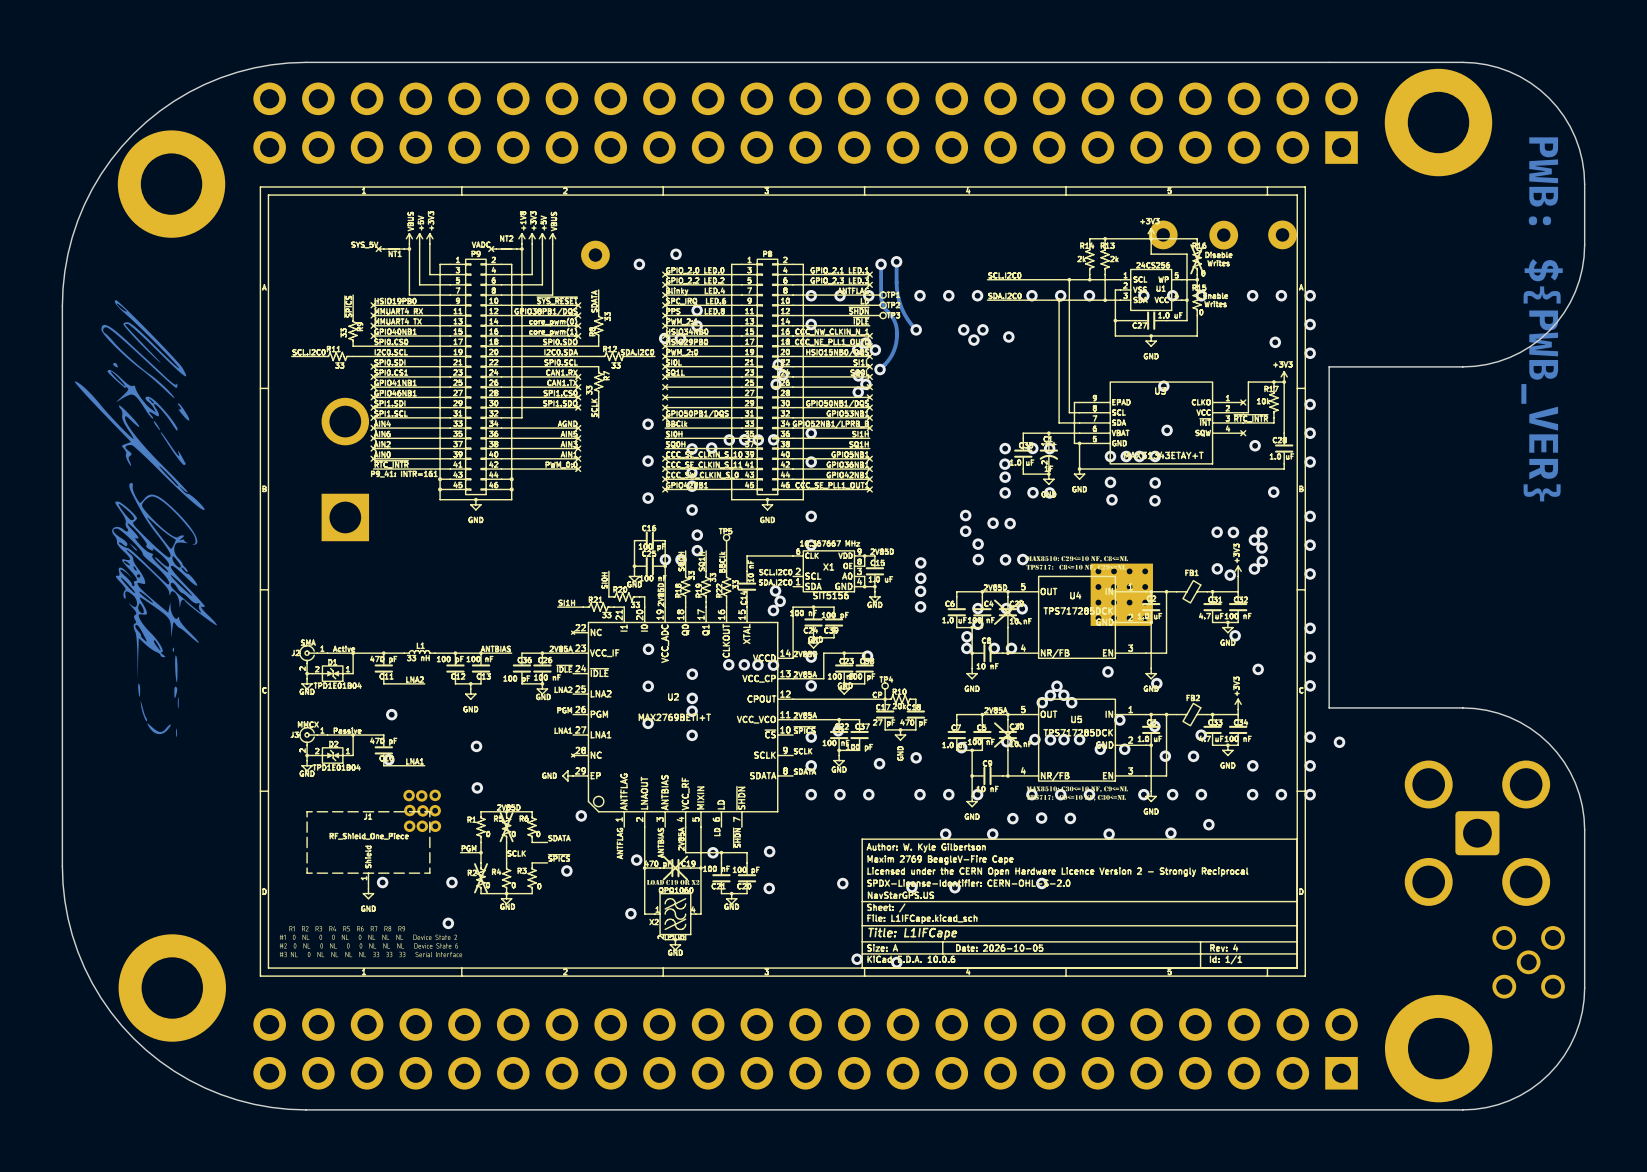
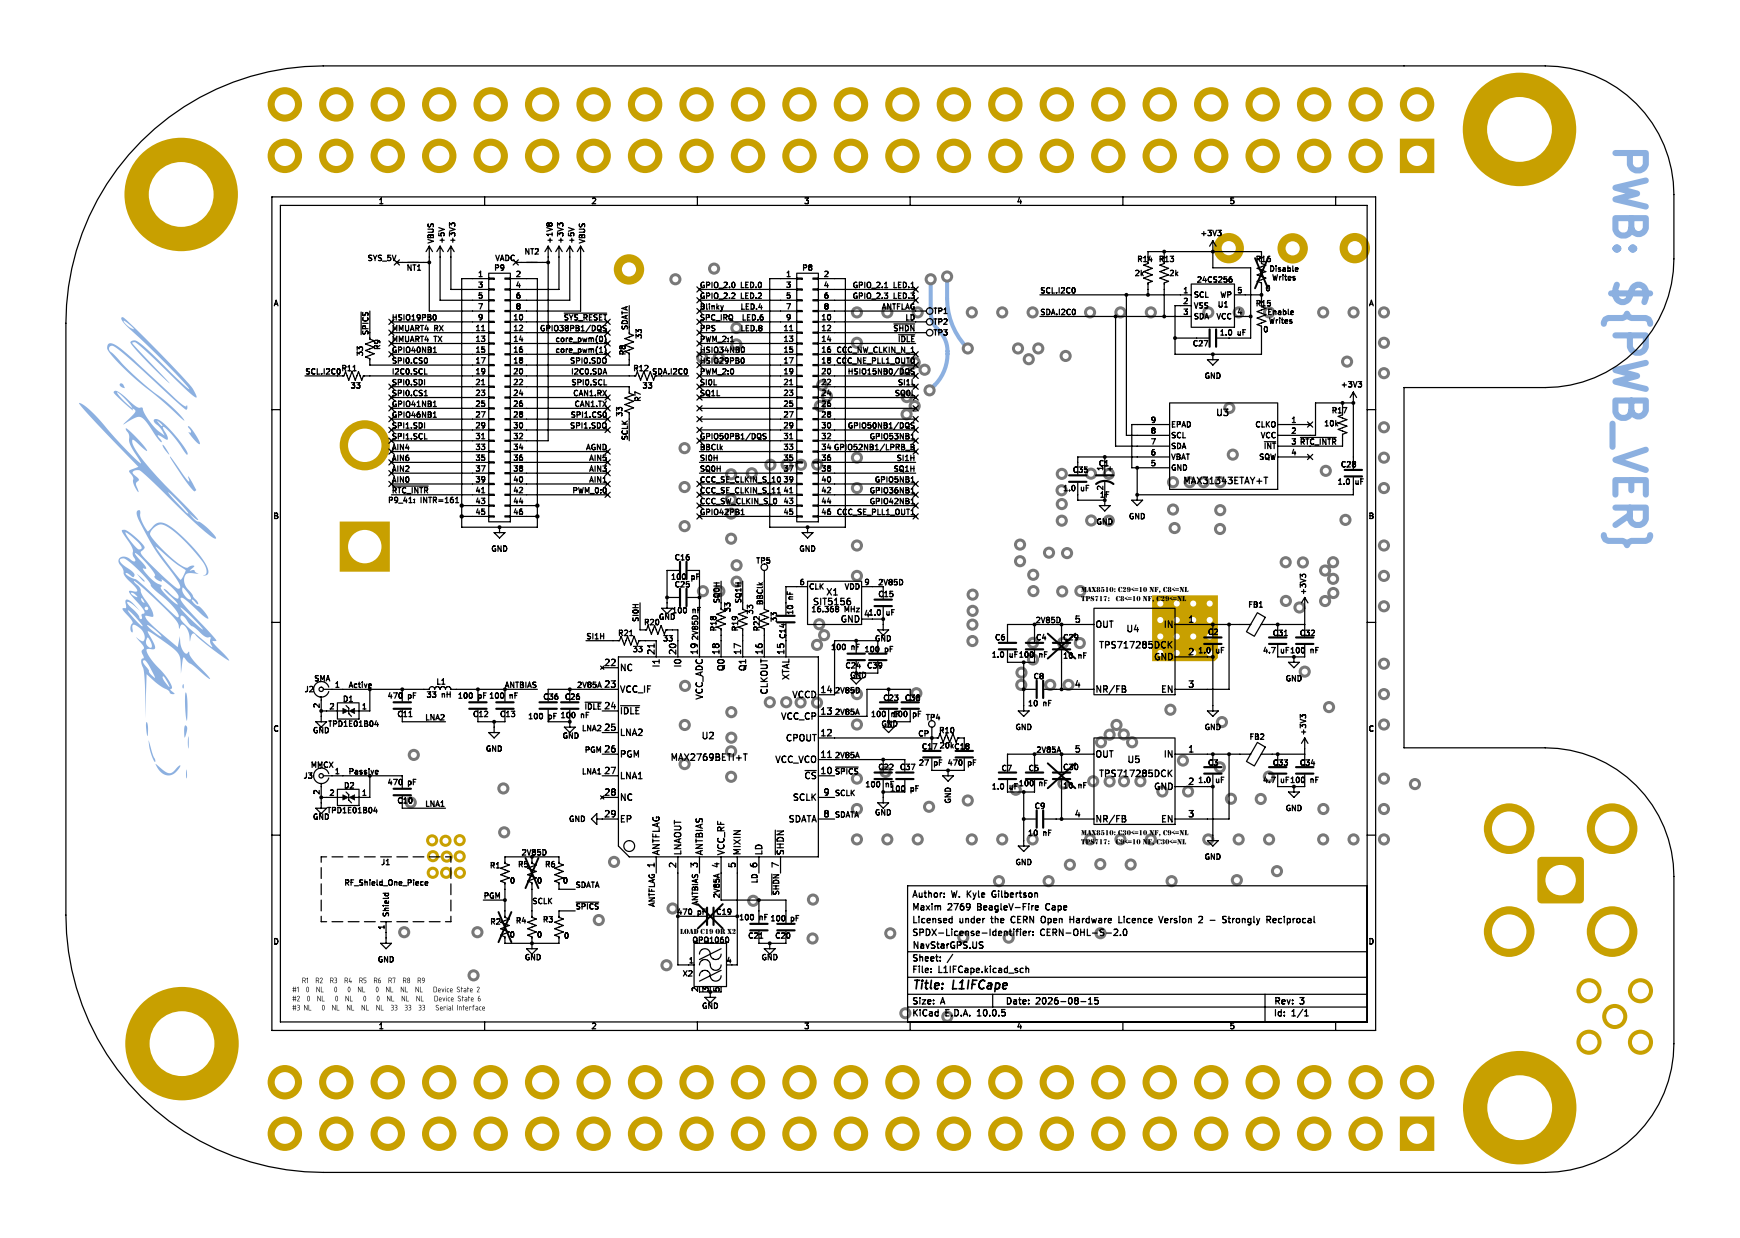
drawing shape: [260, 186, 1306, 977] -> [271, 196, 1376, 1031]

